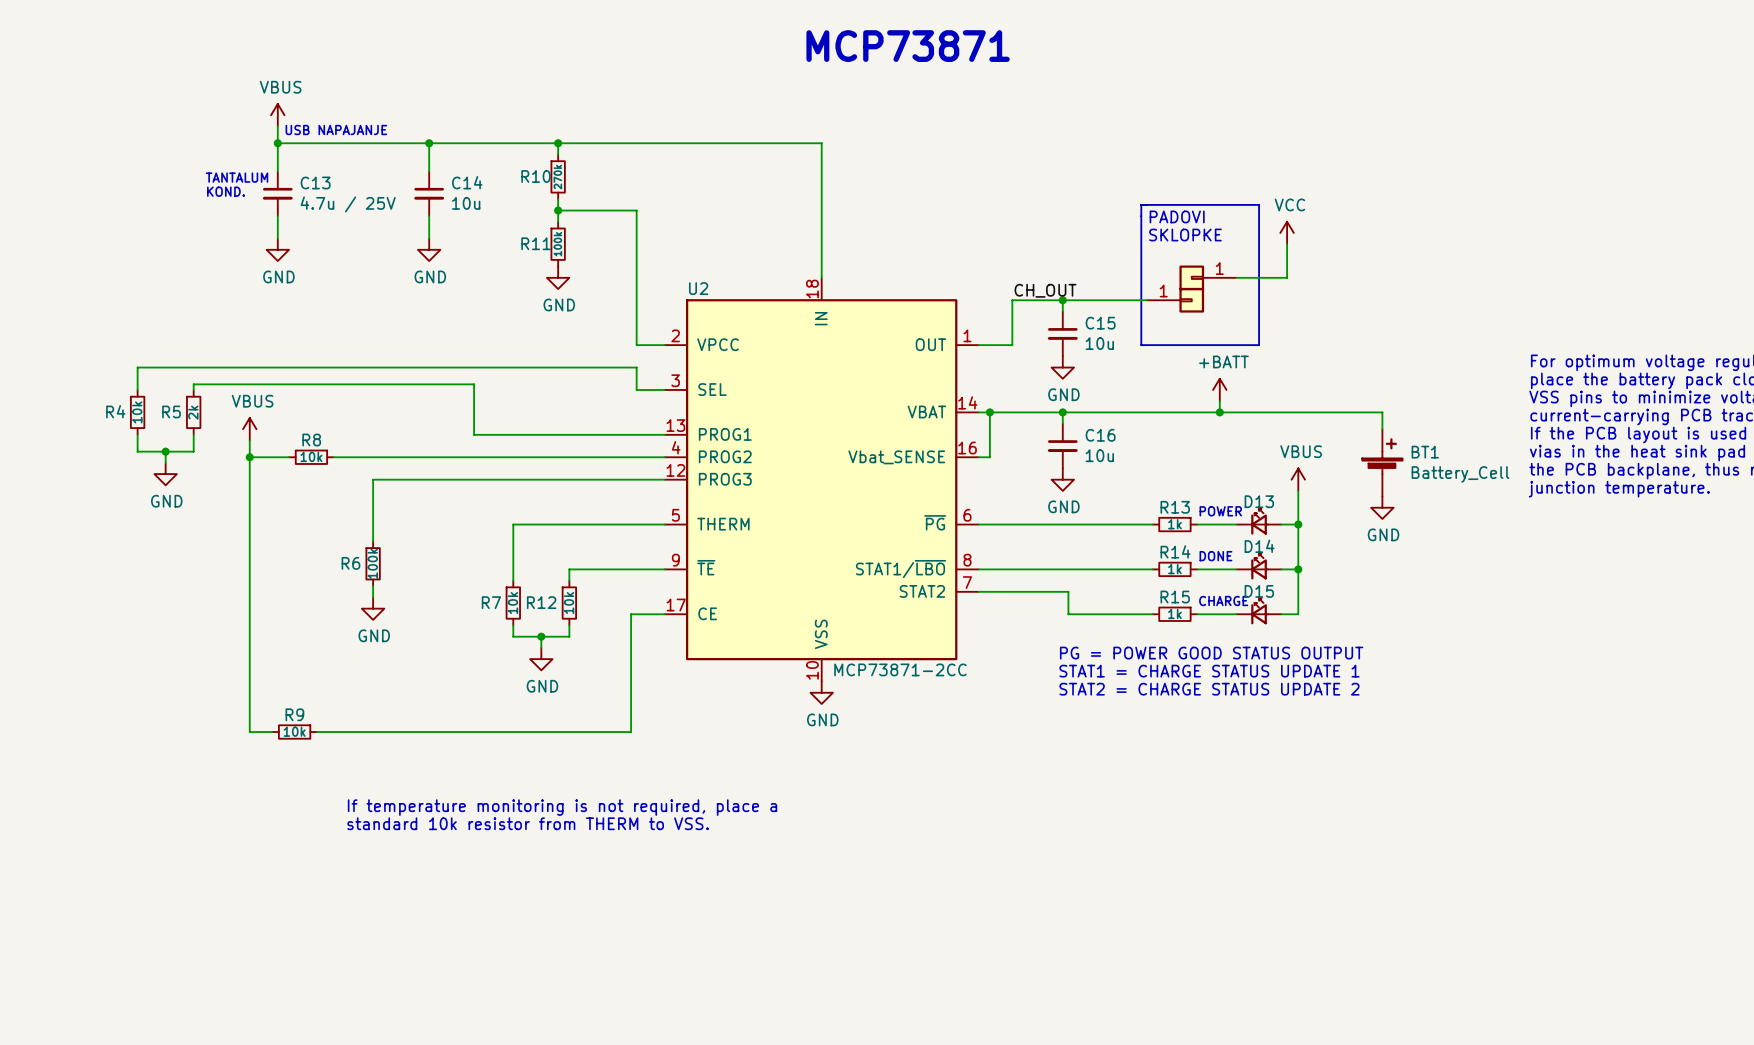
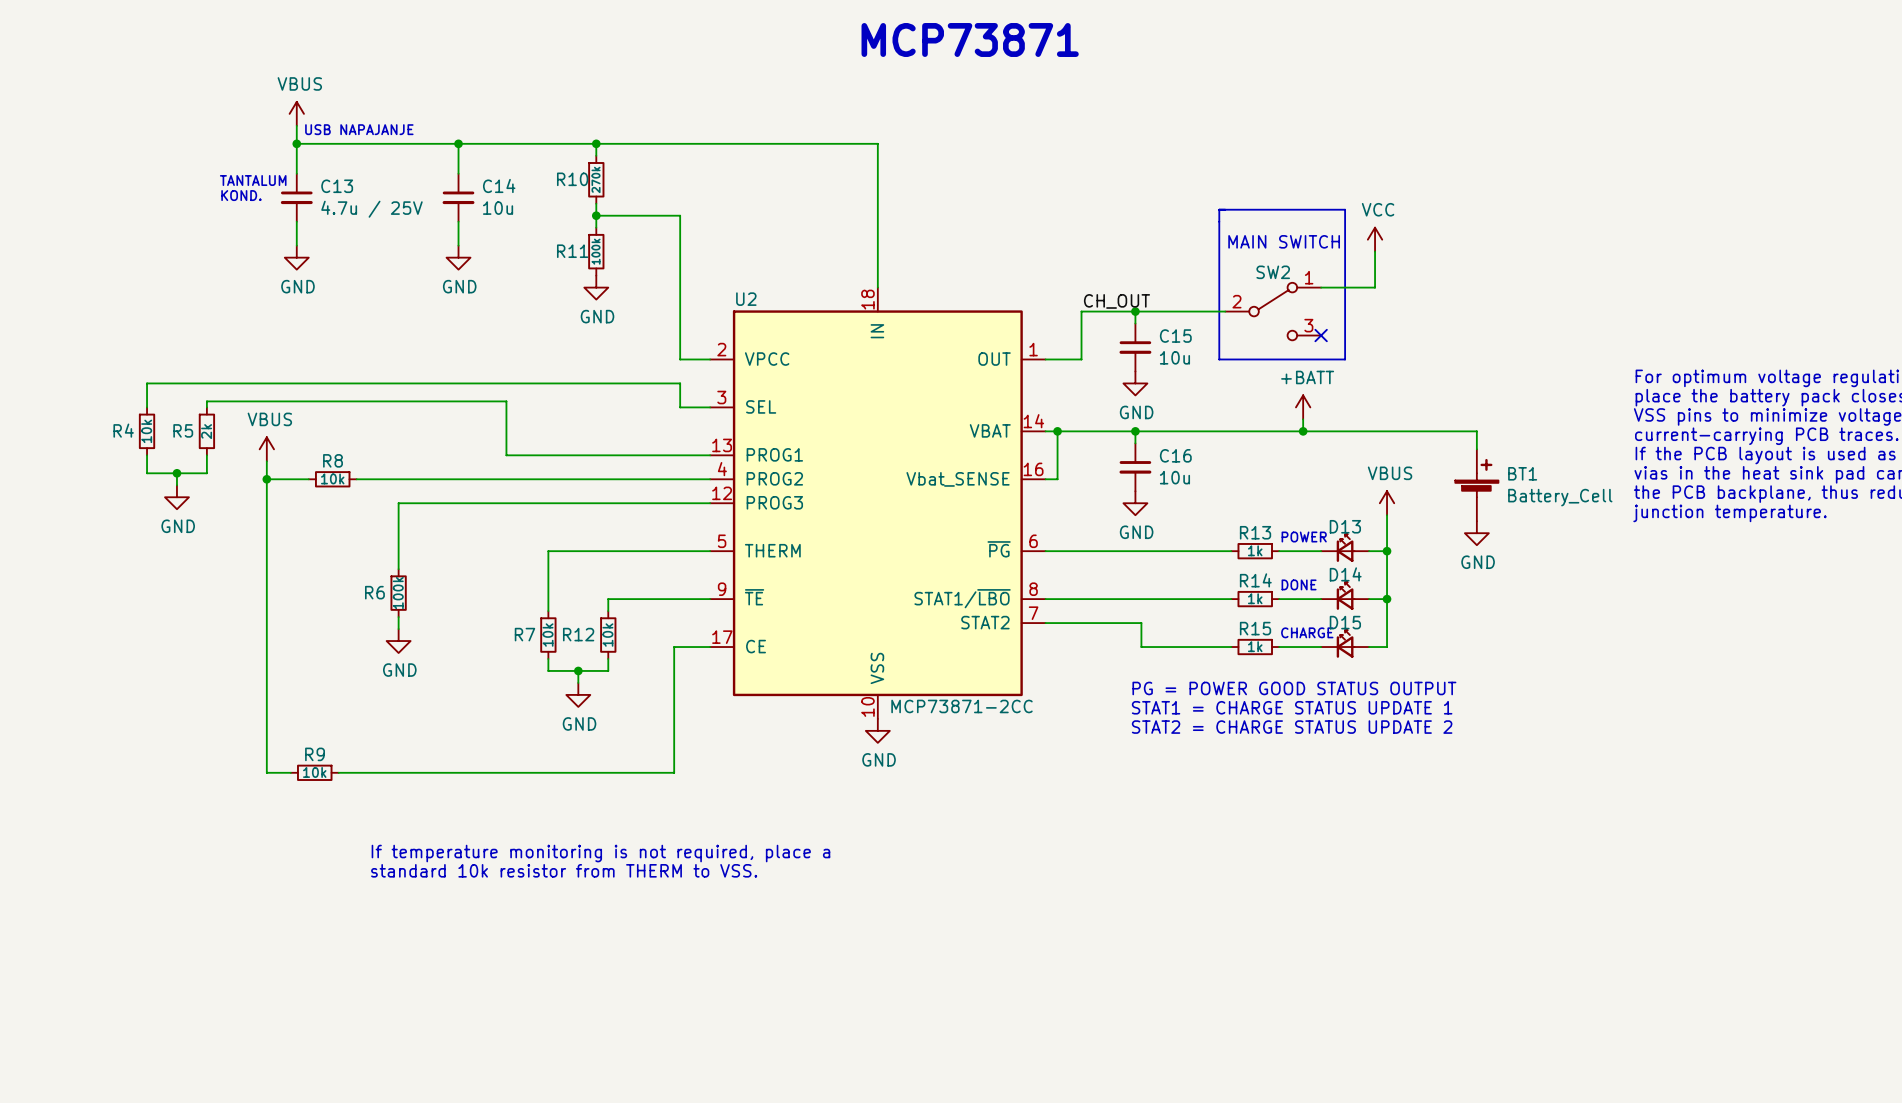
text: PADOVI (1177, 216) -> none
text: SKLOPKE (1185, 235) -> MAIN SWITCH (1284, 241)
part: (1208, 277) -> none
part: (1175, 300) -> none
SW2: none -> (1273, 311)
no-connect mark: none -> (1321, 335)

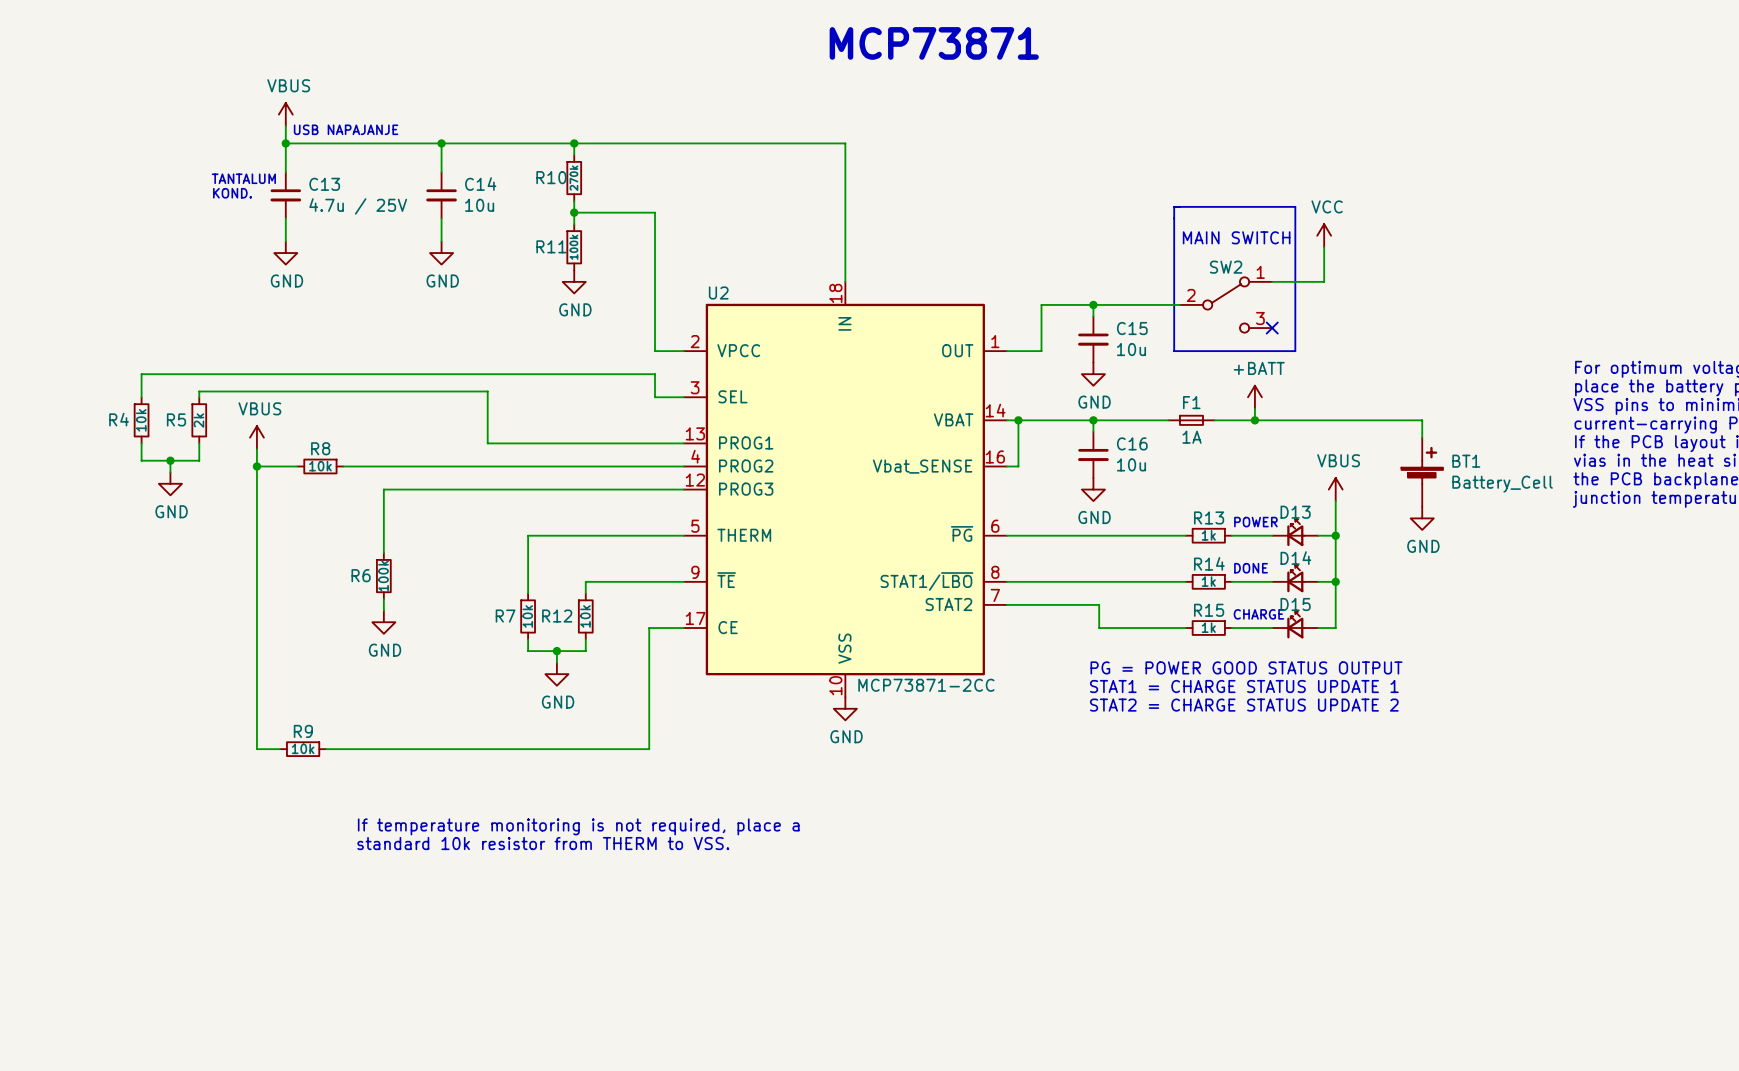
label: CH_OUT (1116, 301) -> none
F1: none -> 1A (1191, 420)

